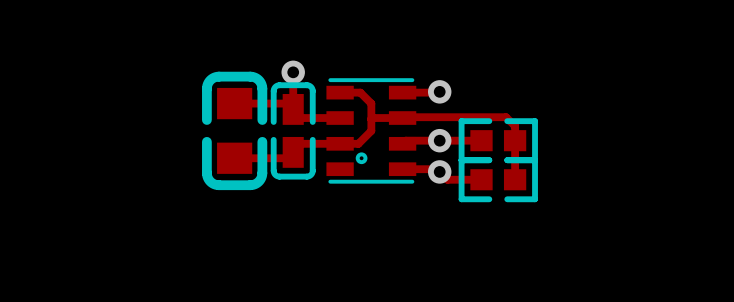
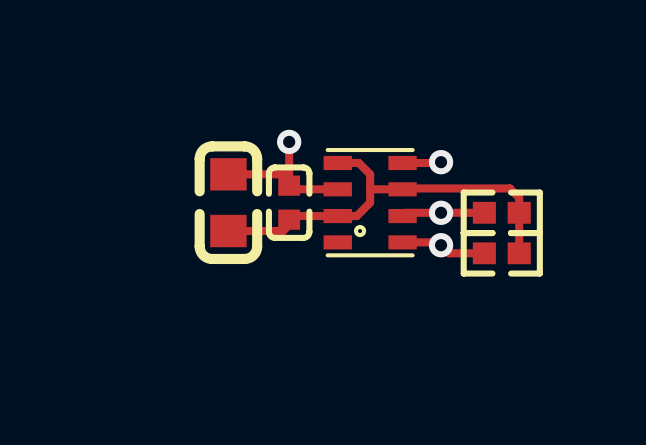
part footprint: [270, 82, 316, 180] -> [265, 164, 313, 241]

